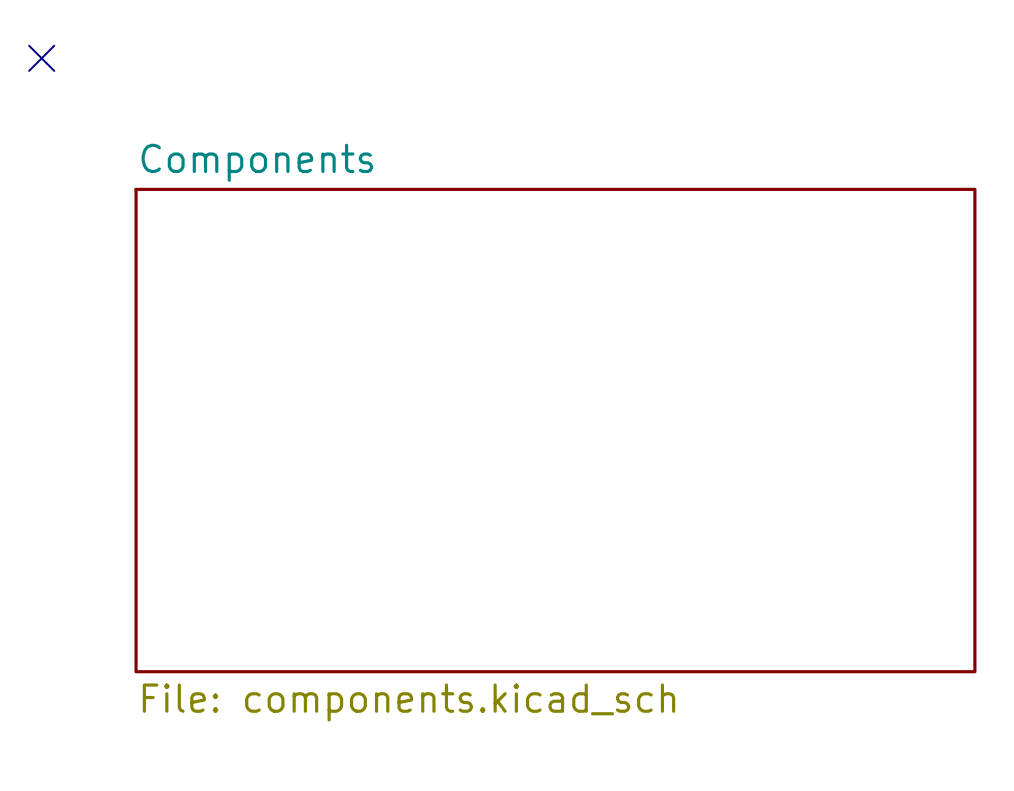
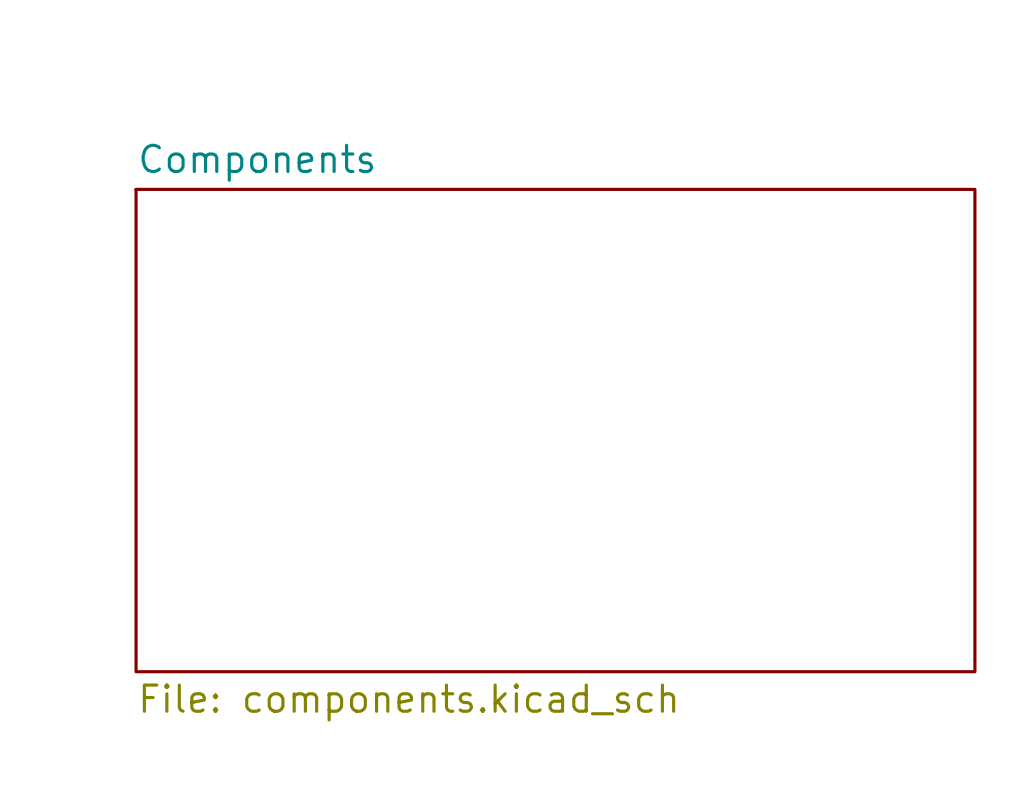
no-connect mark: (41, 58) -> none

